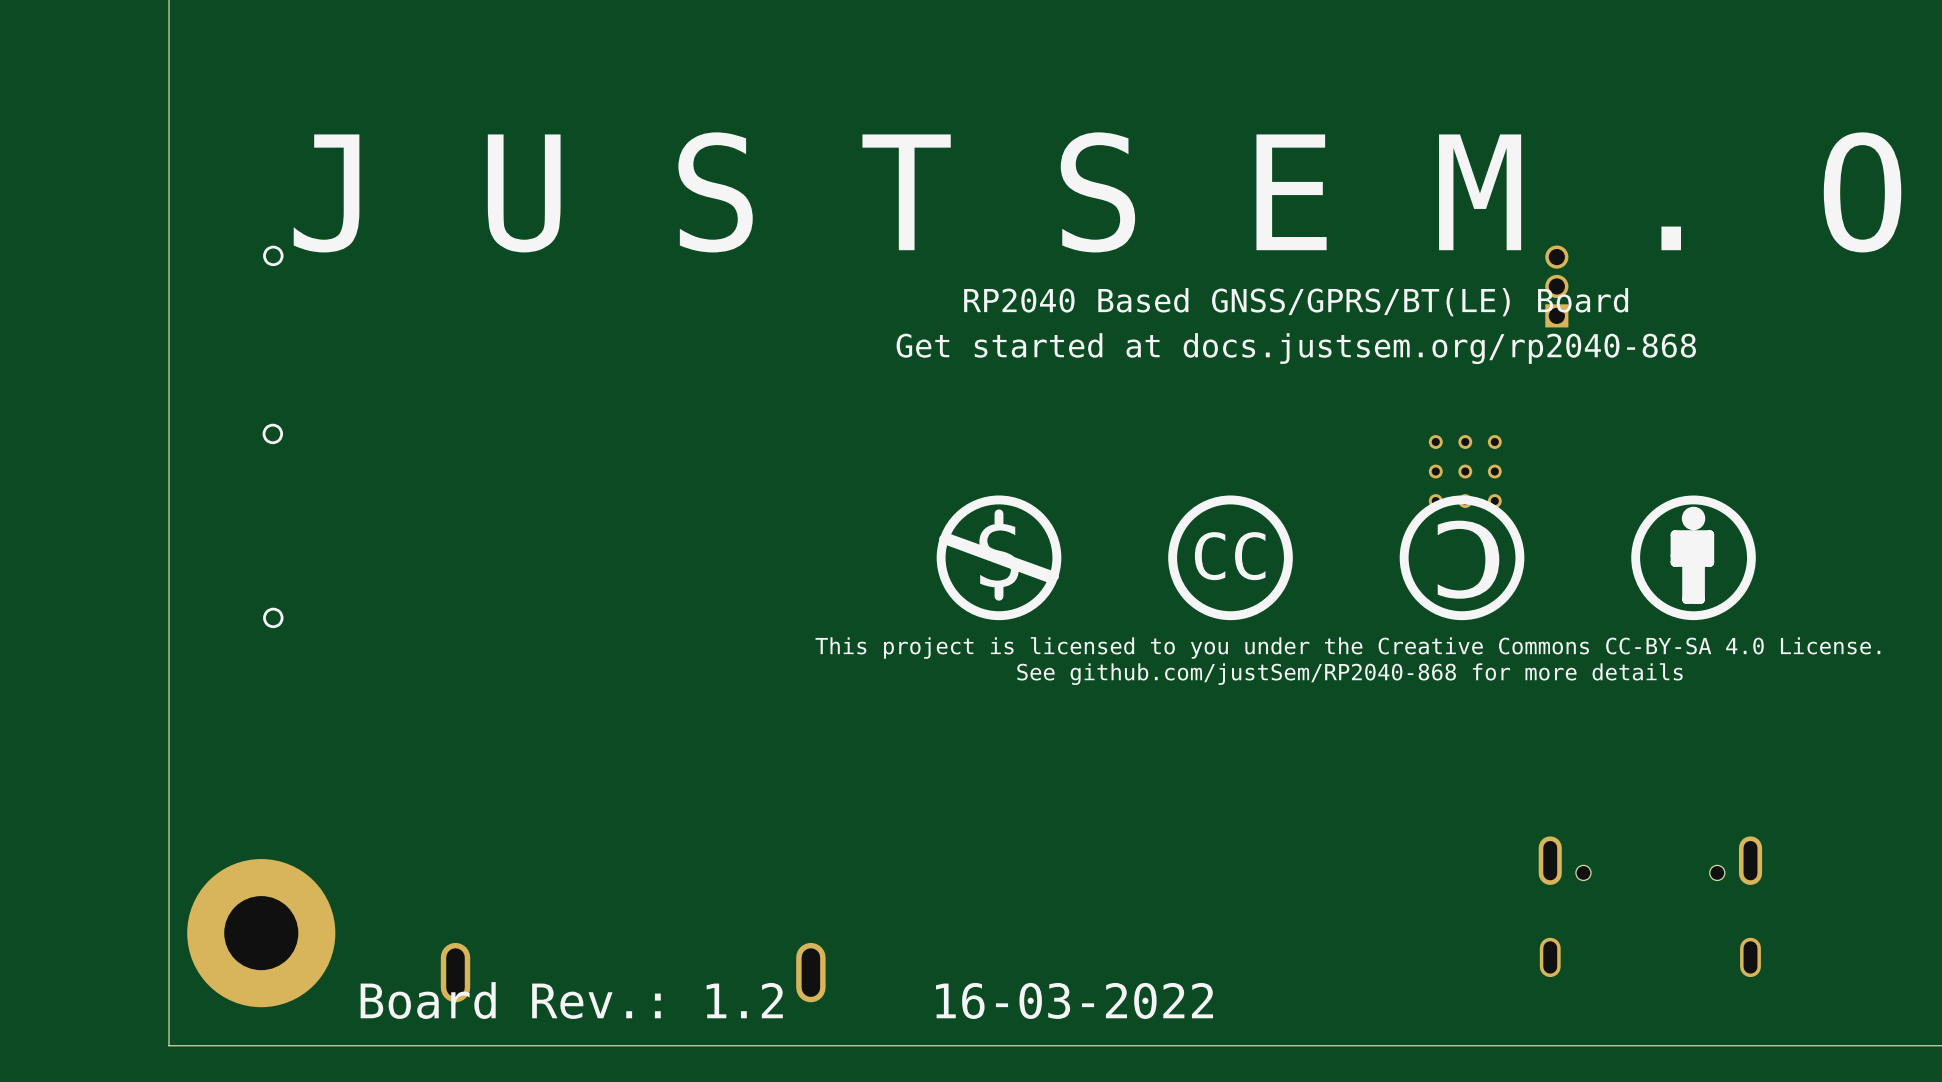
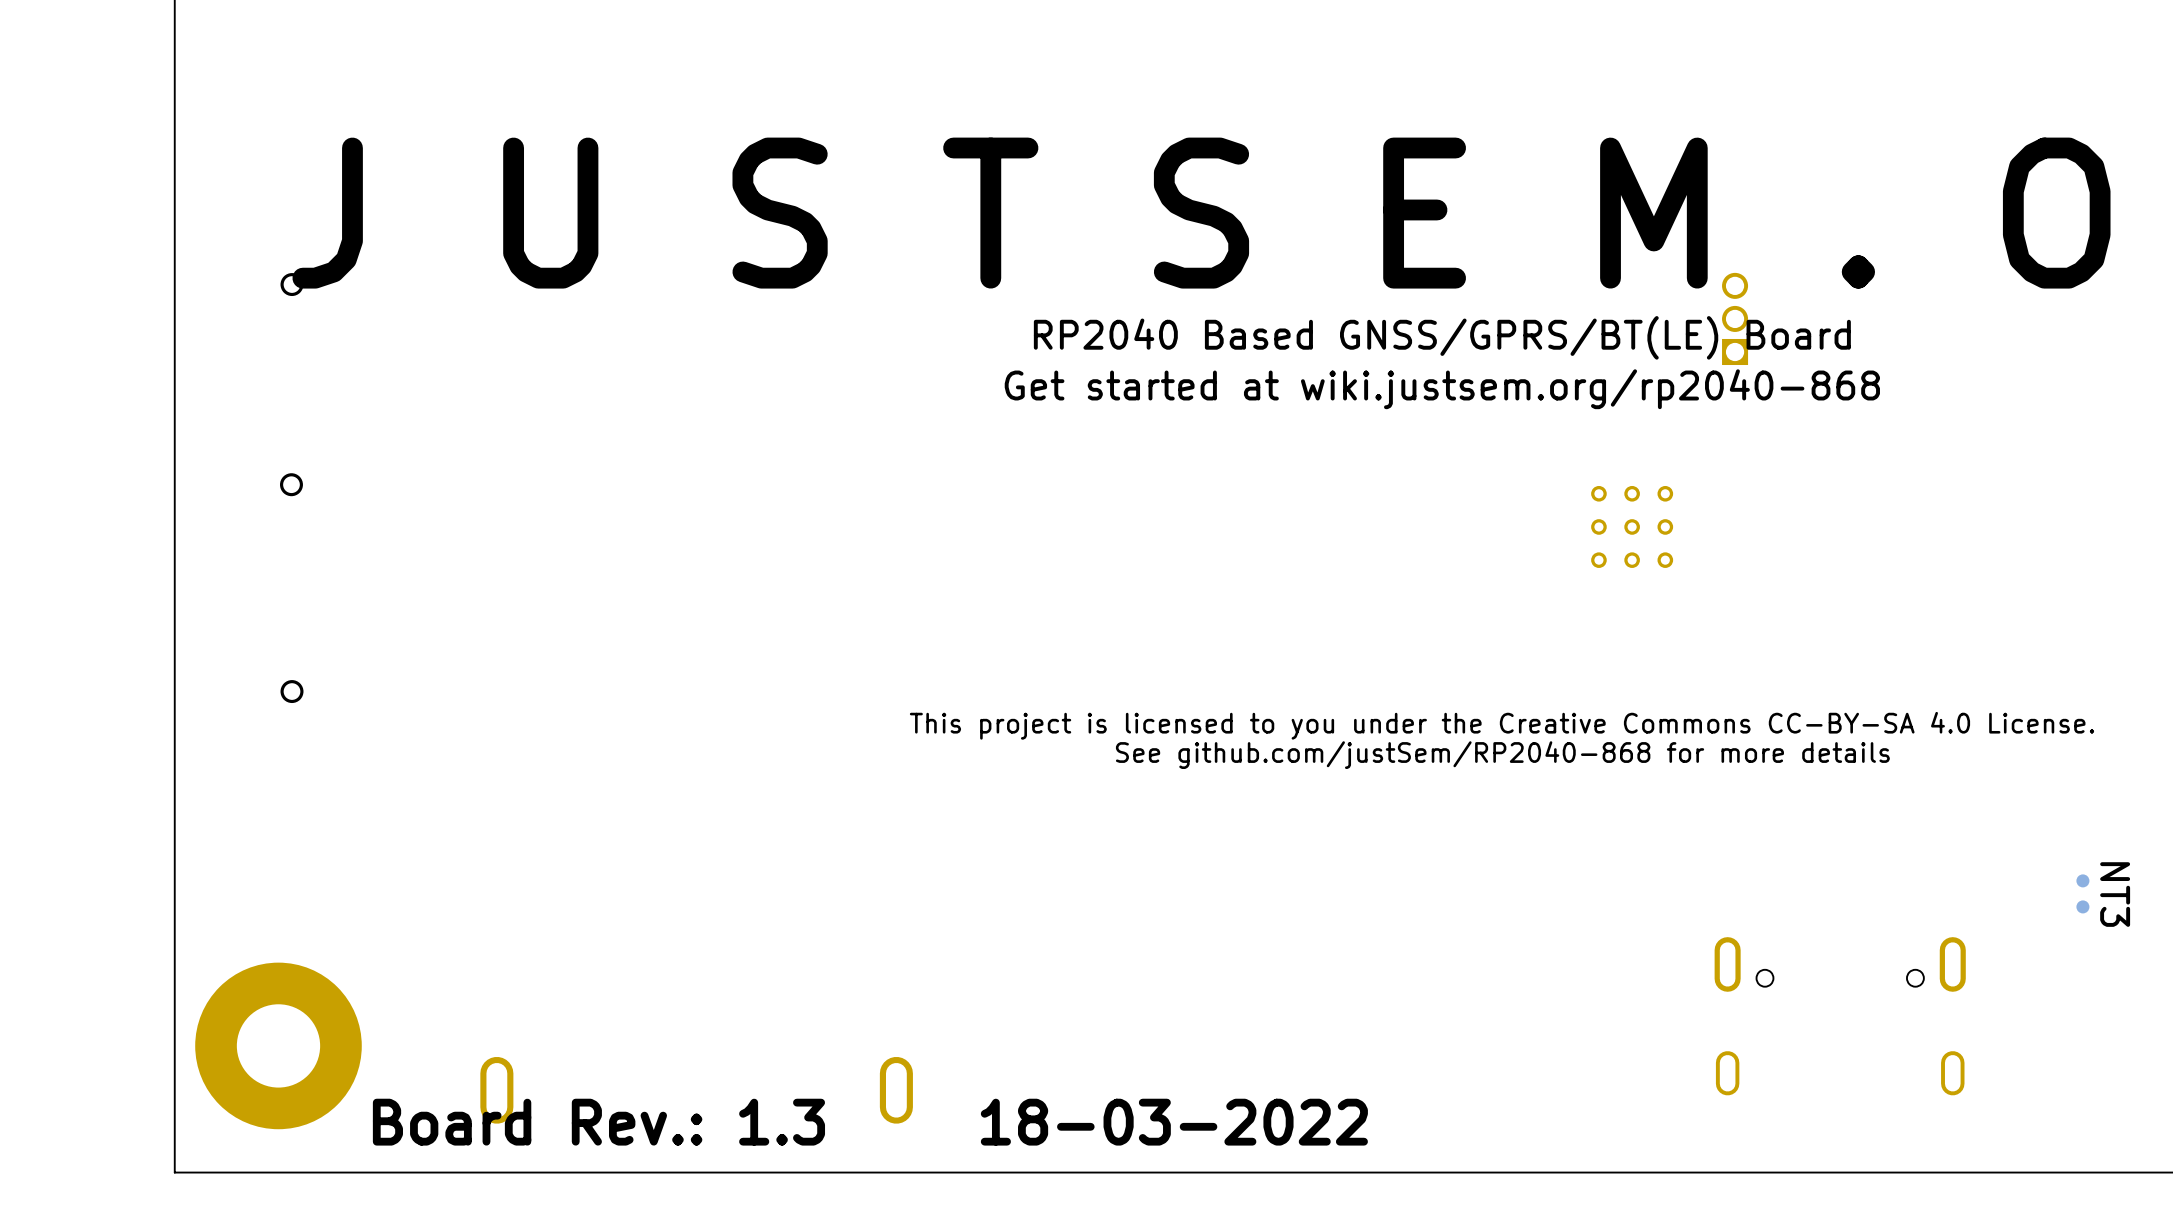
text: Get started at docs.justsem.org/rp2040-868 (1296, 348) -> Get started at wiki.justsem.org/rp2040-868 (1442, 389)
drawing: [936, 495, 1062, 621] -> none
drawing: [1168, 495, 1293, 621] -> none
drawing: [1399, 495, 1525, 621] -> none
drawing: [1631, 495, 1756, 621] -> none
NT3: none -> (2082, 893)
text: Board Rev.: 1.2 16-03-2022 (786, 1000) -> Board Rev.: 1.3 18-03-2022 (870, 1122)

